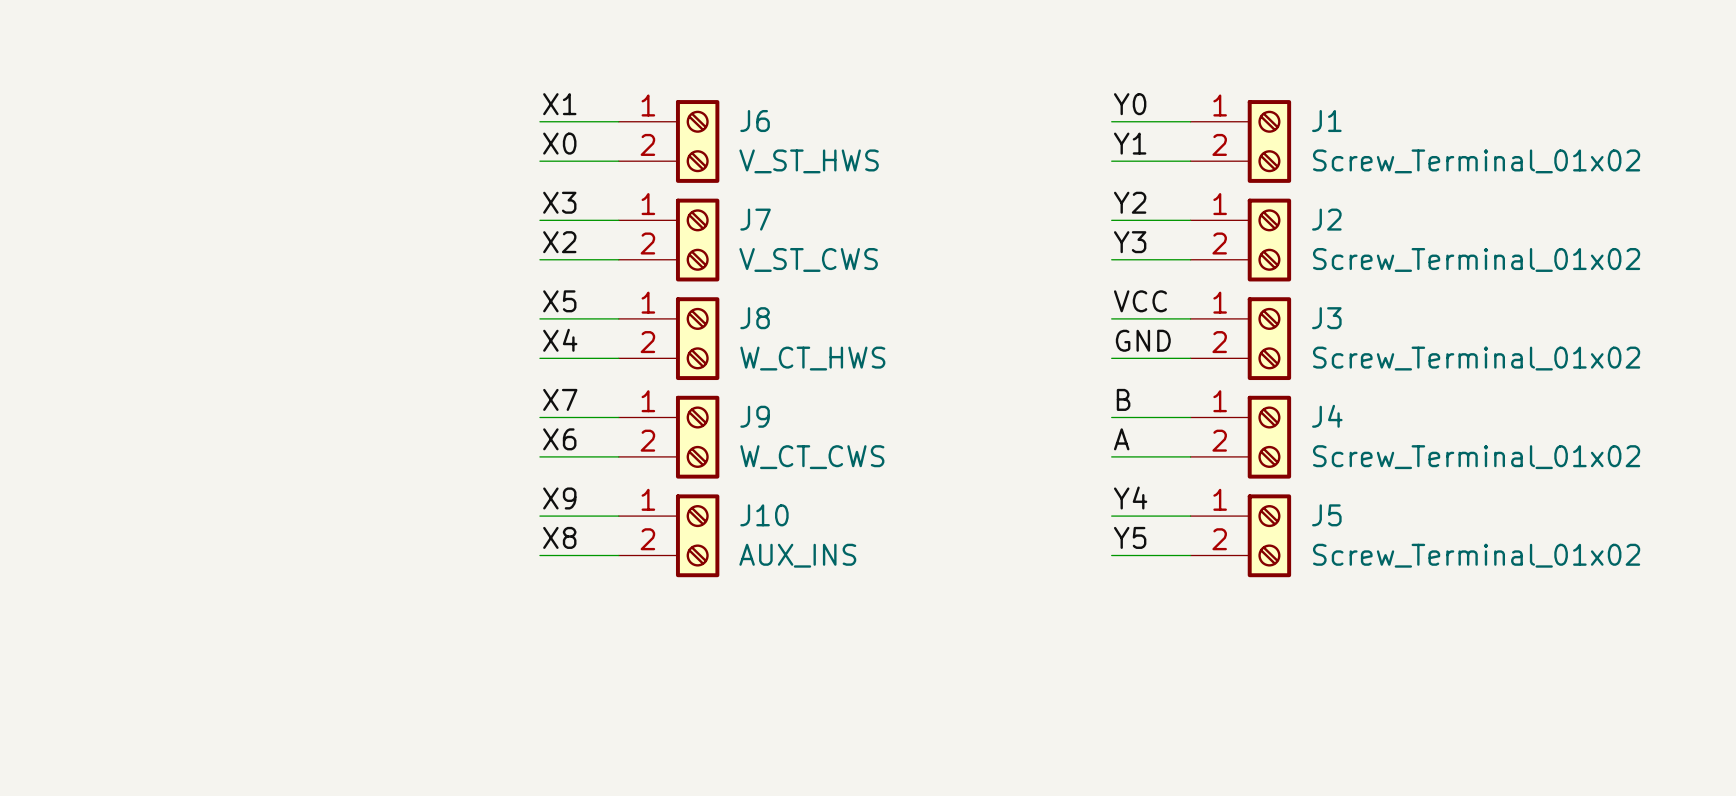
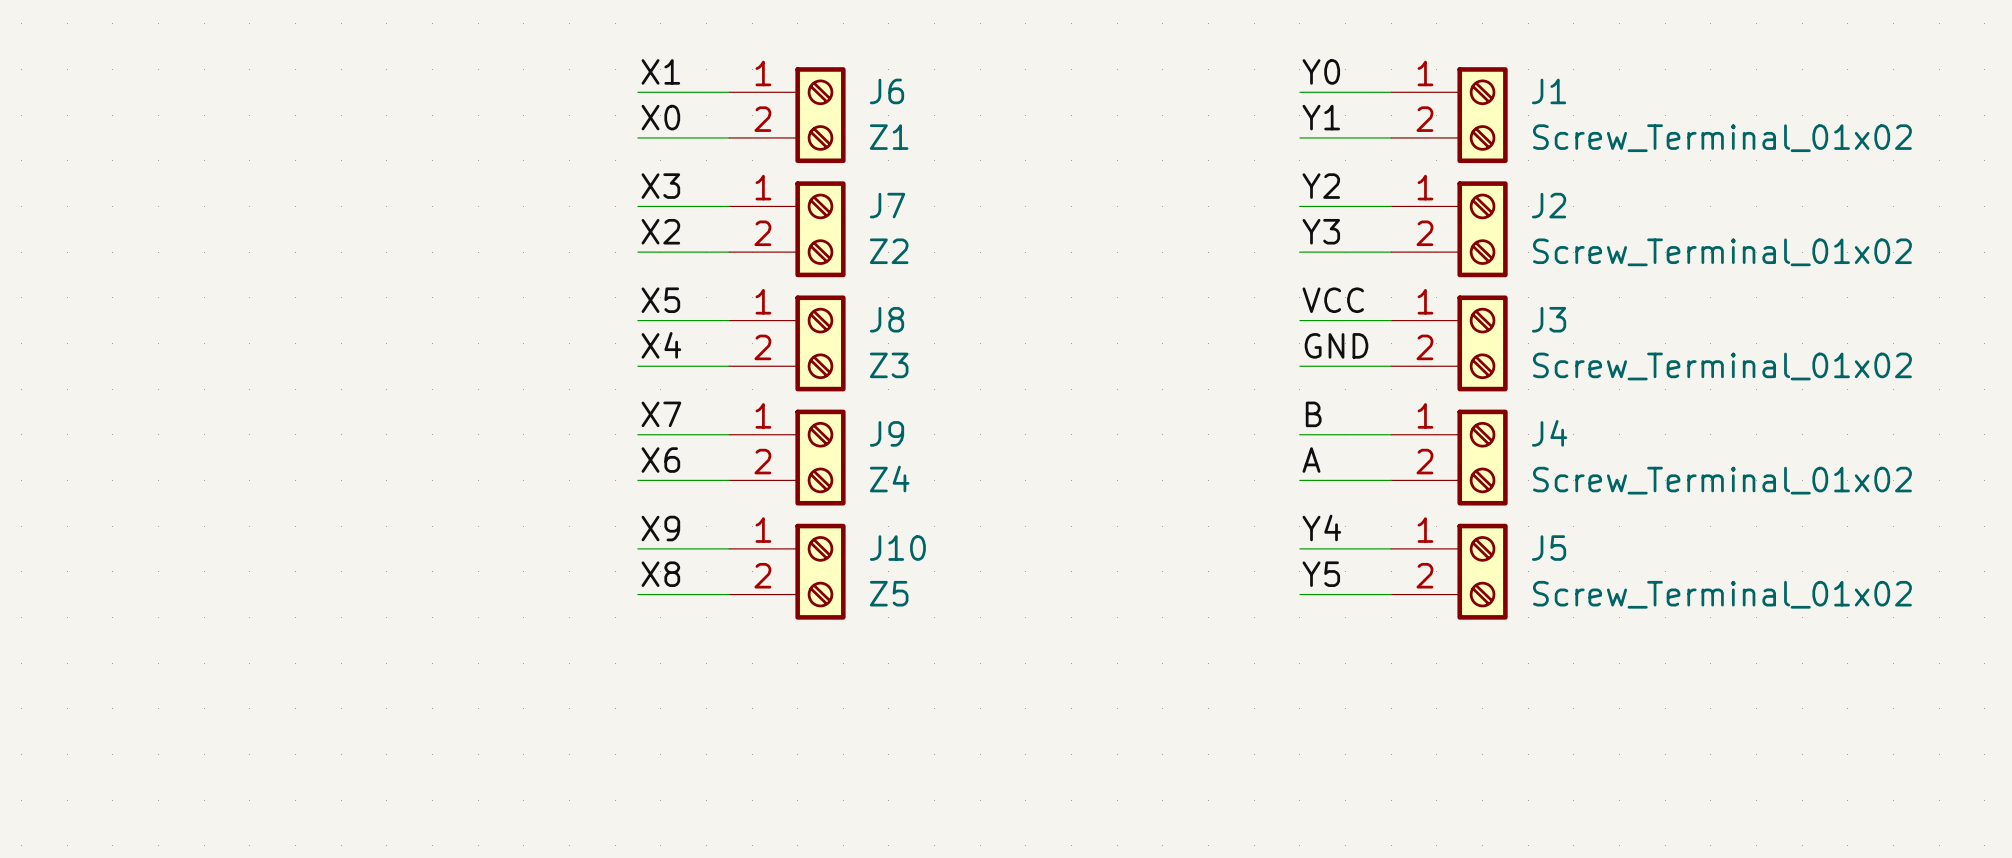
J6 value: V_ST_HWS (809, 161) -> Z1 (889, 137)
J7 value: V_ST_CWS (808, 259) -> Z2 (889, 251)
J8 value: W_CT_HWS (812, 358) -> Z3 (889, 365)
J9 value: W_CT_CWS (812, 457) -> Z4 (889, 479)
J10 value: AUX_INS (797, 555) -> Z5 (889, 593)

